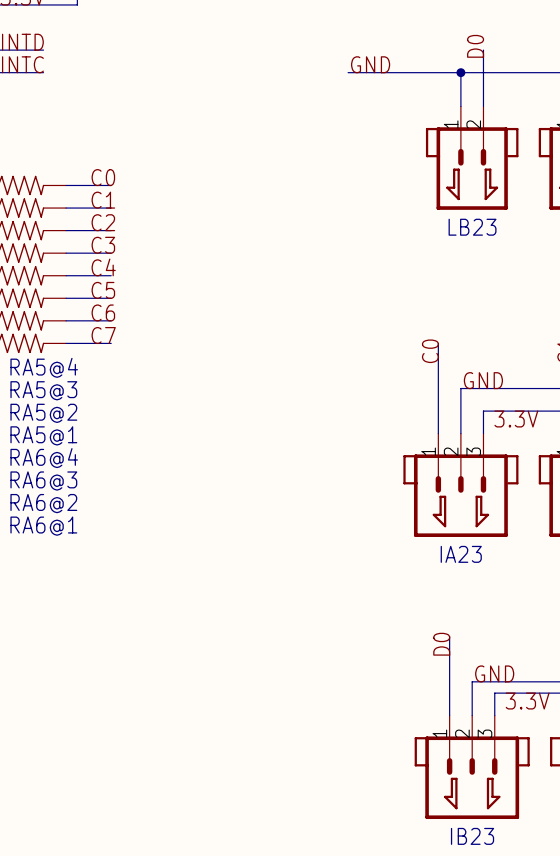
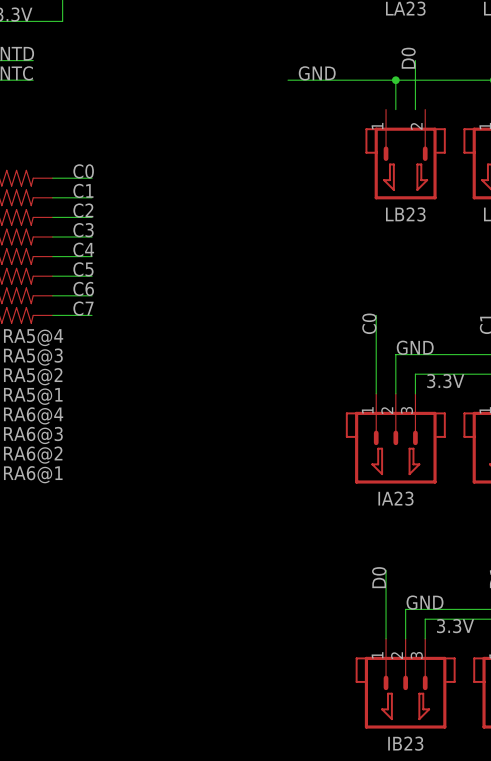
wire: none -> (288, 80) (297, 80)
LB23 symbol: [425, 106, 519, 210] -> [365, 109, 446, 200]

